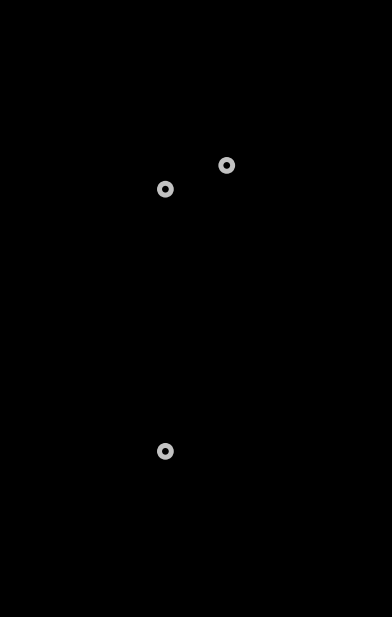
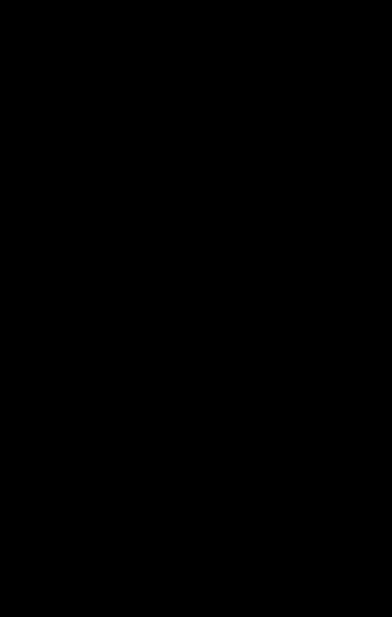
via: (226, 165) -> none
via: (165, 189) -> none
via: (165, 451) -> none

